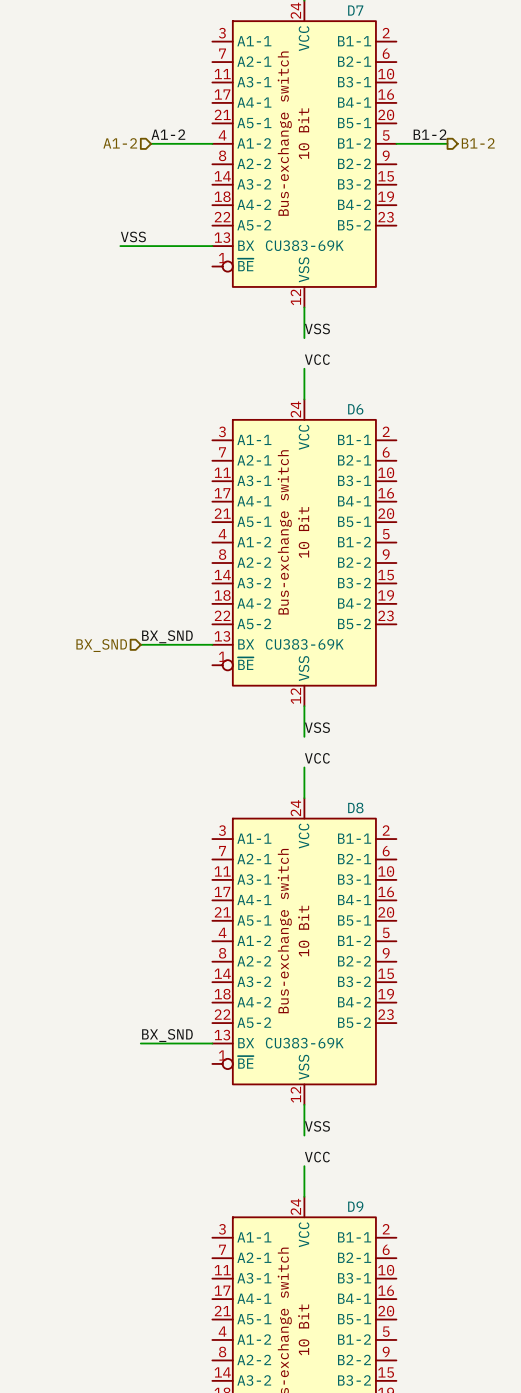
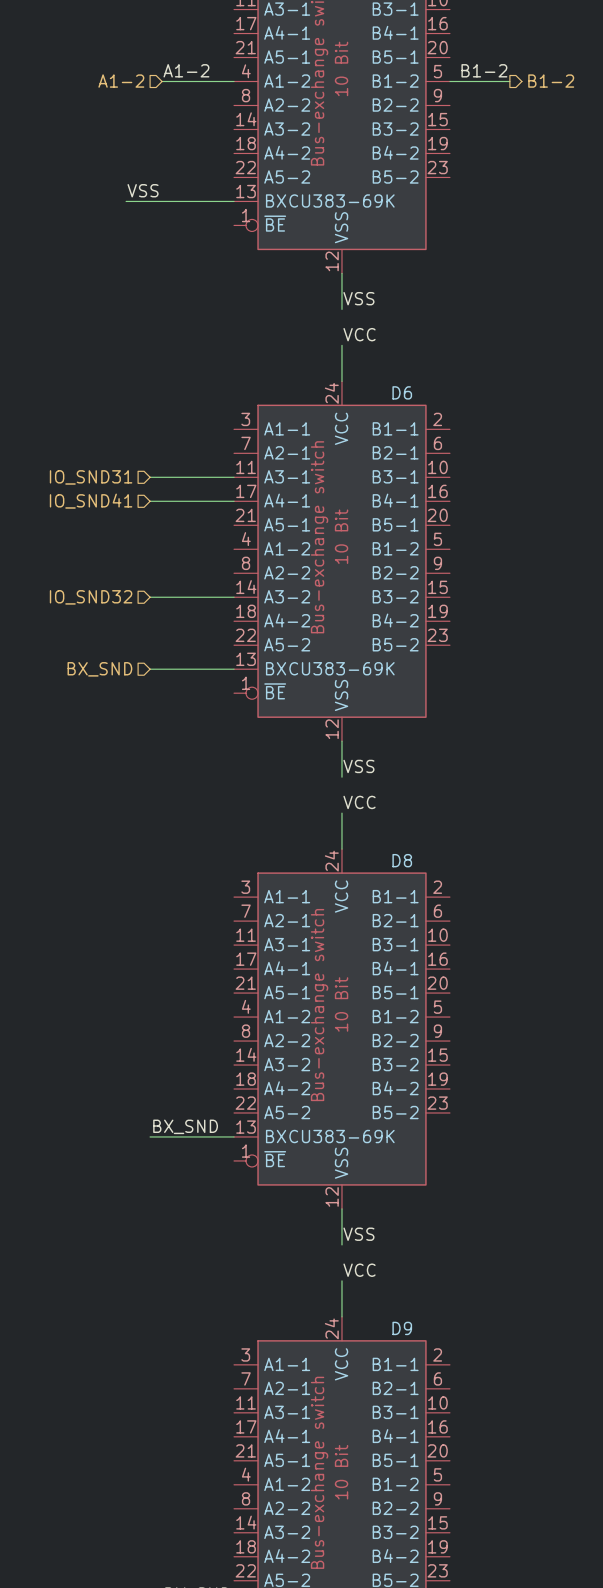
hierarchical label: none -> IO_SND31 (91, 477)
wire: none -> (150, 477) (234, 477)
wire: none -> (150, 501) (234, 501)
hierarchical label: none -> IO_SND41 (91, 501)
wire: none -> (150, 597) (234, 597)
hierarchical label: none -> IO_SND32 (91, 597)
label: BX_SND (167, 636) -> none

